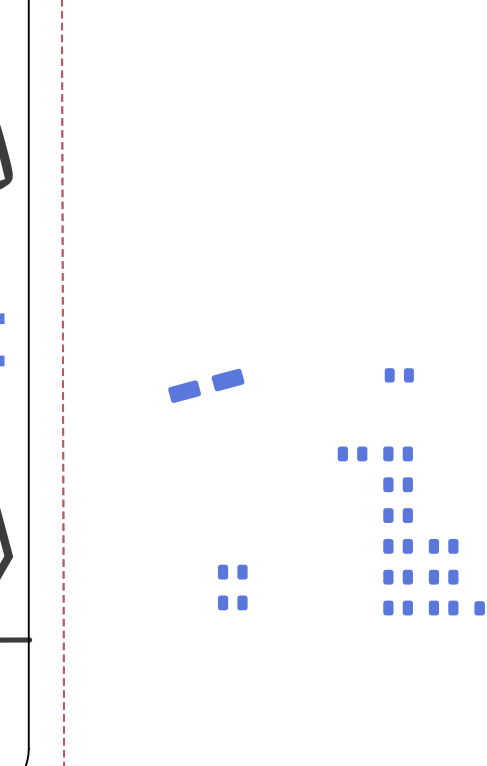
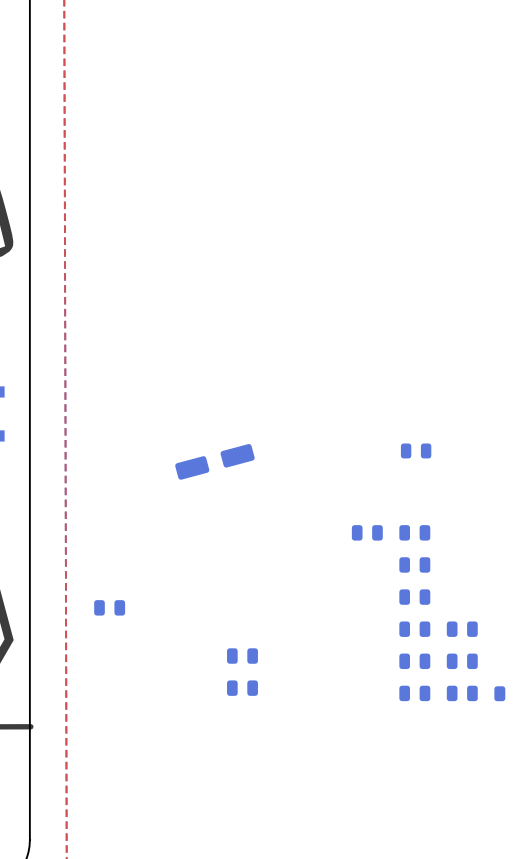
part: none -> (109, 607)

